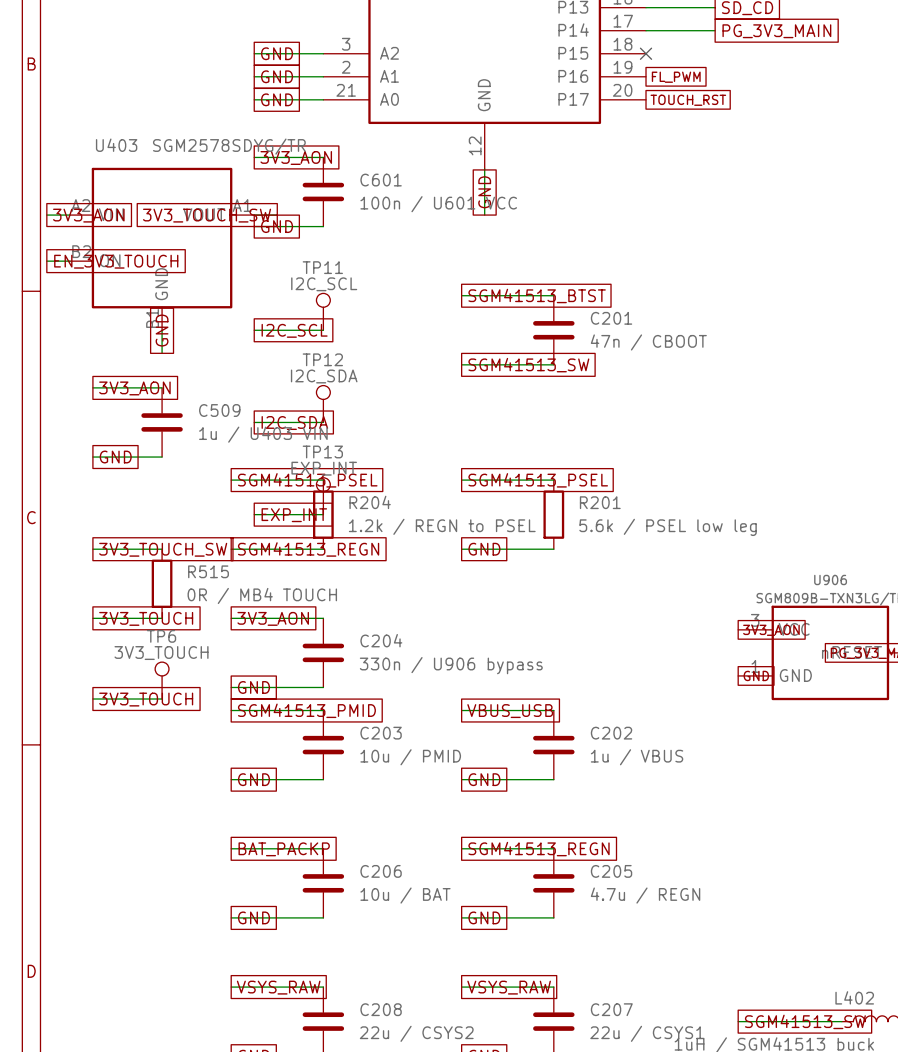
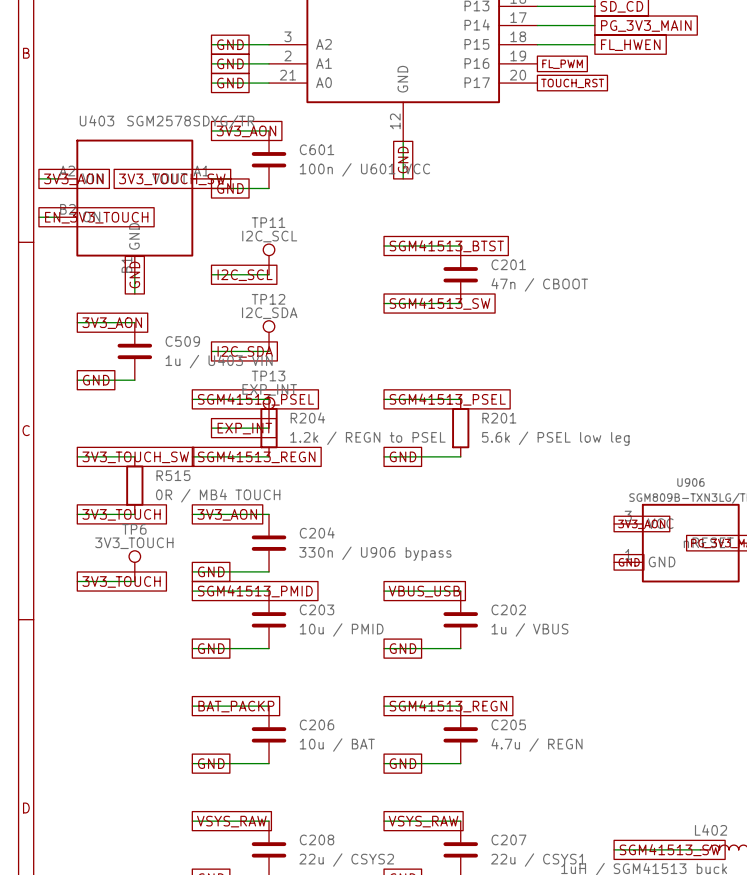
wire: none -> (537, 44) (594, 44)
no-connect mark: (646, 53) -> none
global label: none -> FL_HWEN (630, 45)

